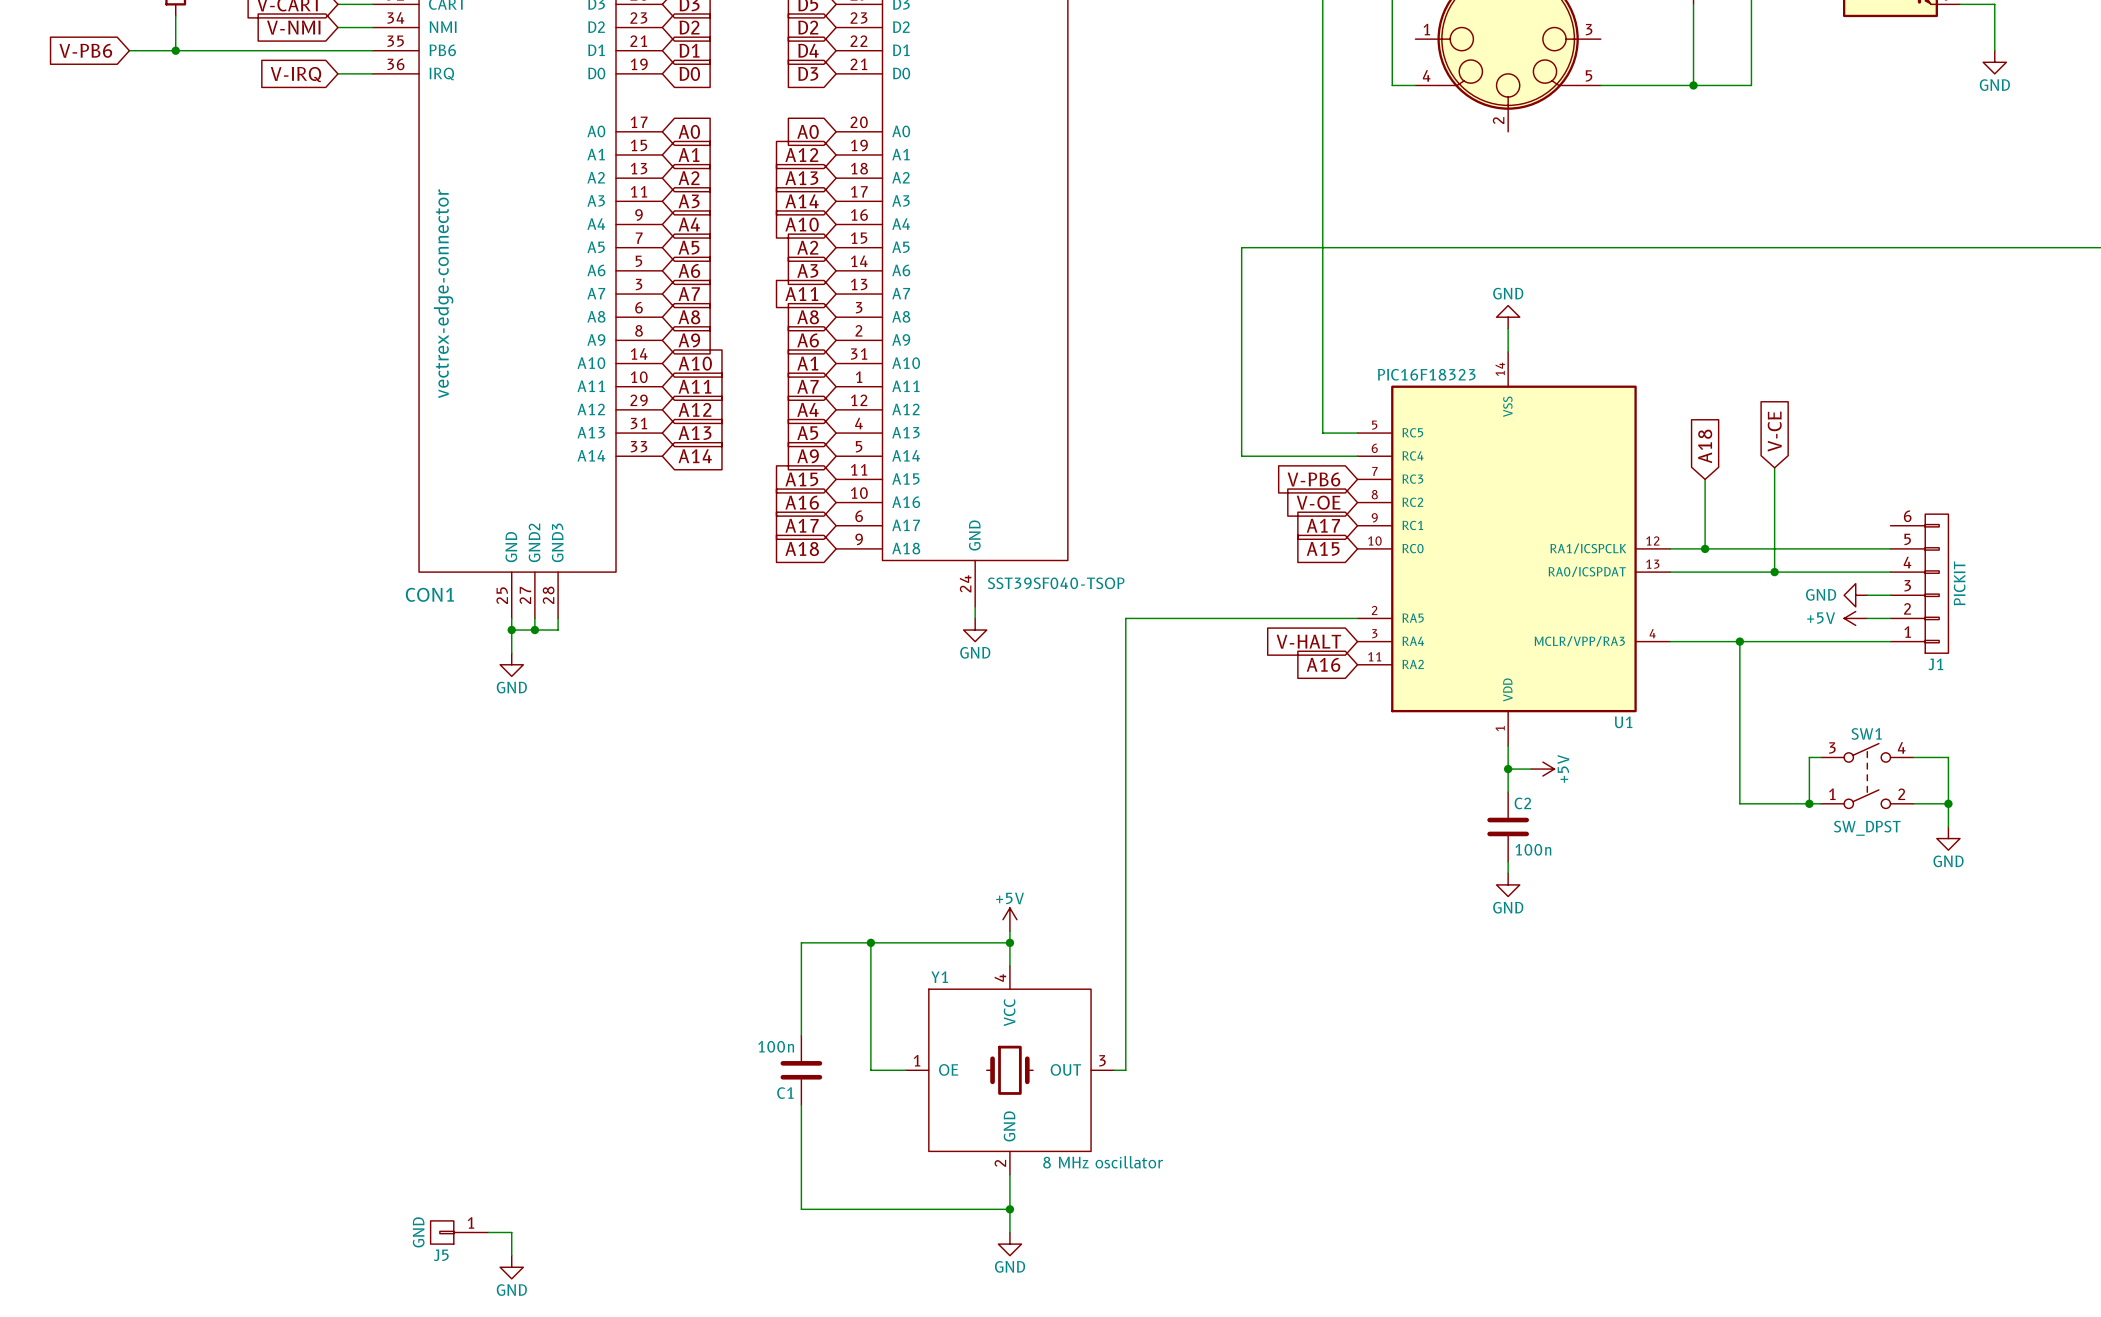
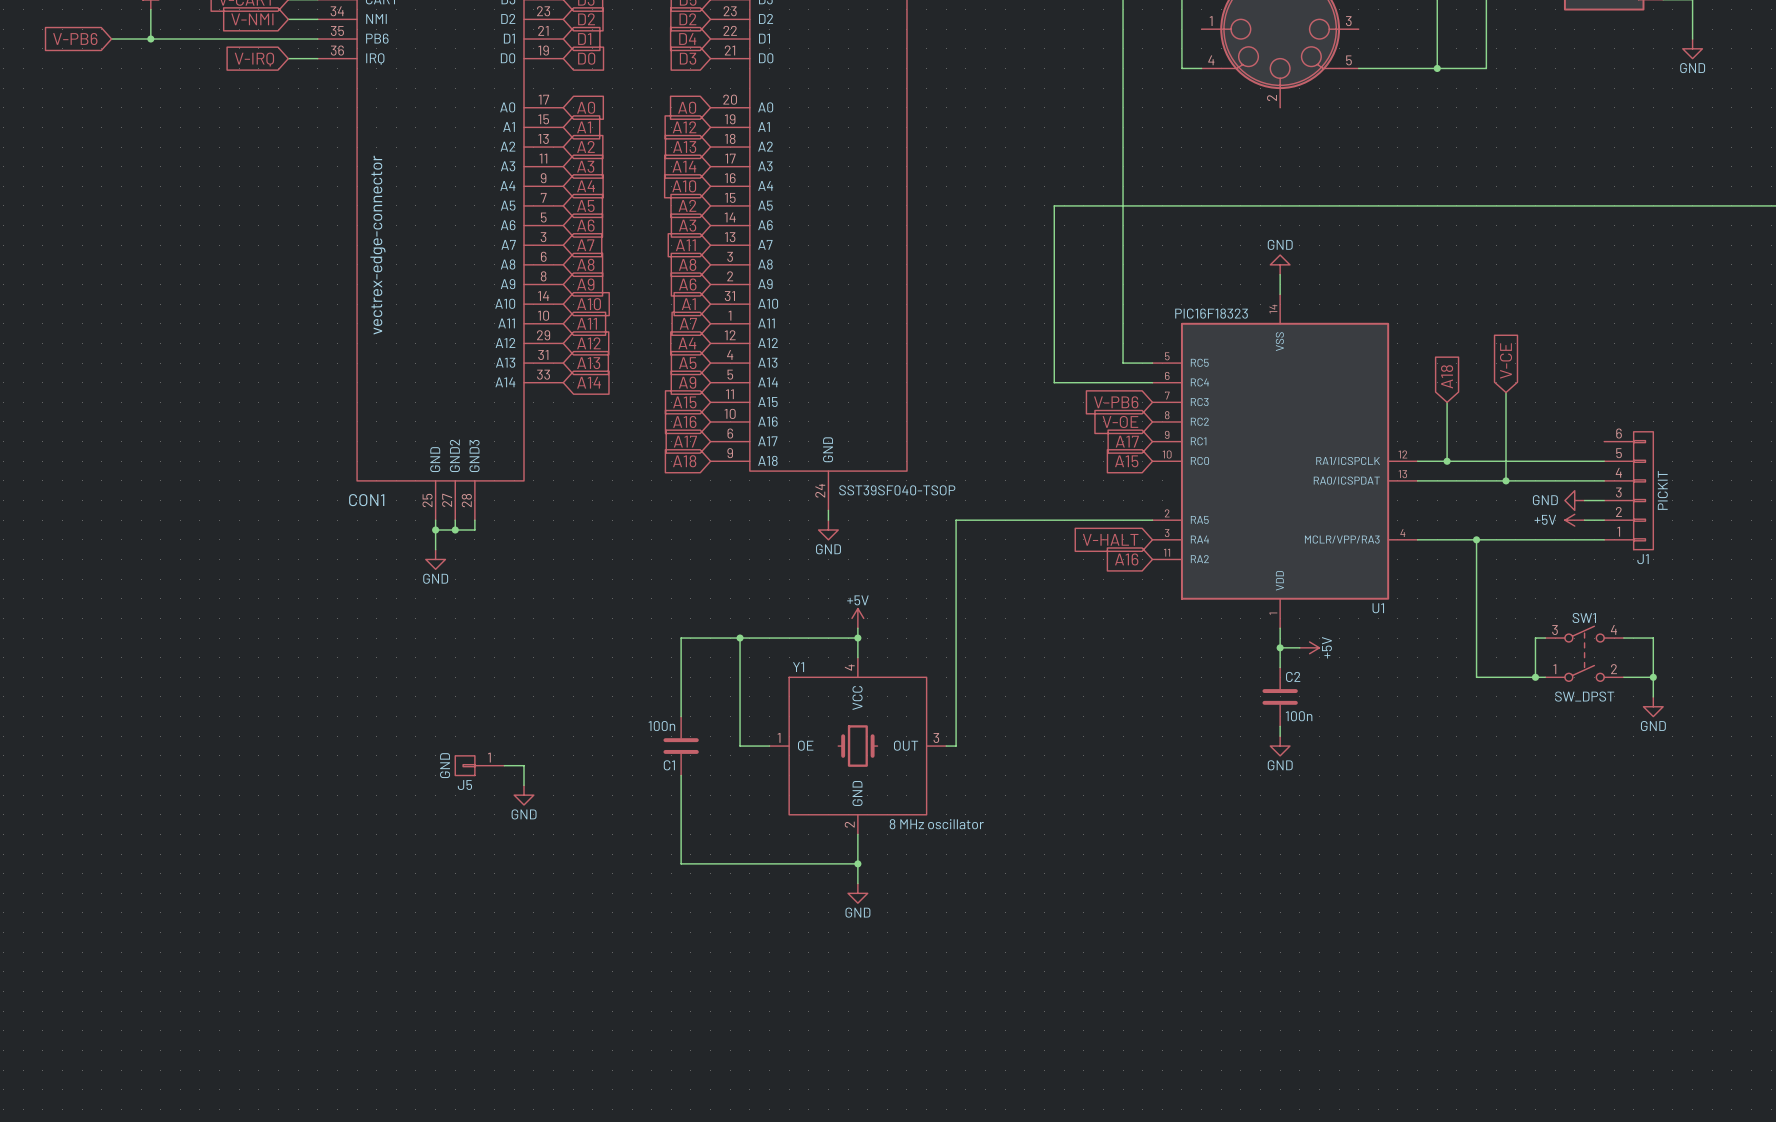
junction: none -> (740, 638)
wire: none -> (857, 638) (681, 638) (681, 716)
junction: none -> (857, 638)
wire: (1125, 884) (1125, 1070) (1114, 1070) -> (956, 746) (946, 746)
wire: none -> (504, 765) (524, 765) (524, 785)
power symbol position: +5V (1009, 919) -> +5V (857, 618)
wire: (1009, 931) (1009, 966) -> (857, 628) (857, 657)
power symbol: none -> GND (524, 795)
wire: (801, 942) (1009, 942) -> (681, 795) (681, 775)
wire: (870, 942) (870, 1070) (905, 1070) -> (740, 638) (740, 746) (769, 746)
junction: (870, 942) -> none
junction: (1009, 942) -> none
wire: (801, 1023) (801, 1035) -> (681, 863) (857, 863)
junction: none -> (857, 863)
C1 position: (801, 1070) -> (681, 746)
Y1 position: (1009, 1070) -> (857, 746)
wire: (801, 1105) (801, 1209) (1009, 1209) -> none
wire: (1009, 1174) (1009, 1232) -> (857, 834) (857, 883)
junction: (1009, 1209) -> none
J5 position: (459, 1232) -> (479, 765)
wire: (488, 1232) (511, 1232) (511, 1255) -> none
power symbol position: GND (1009, 1244) -> GND (857, 893)
power symbol: GND (511, 1267) -> none

